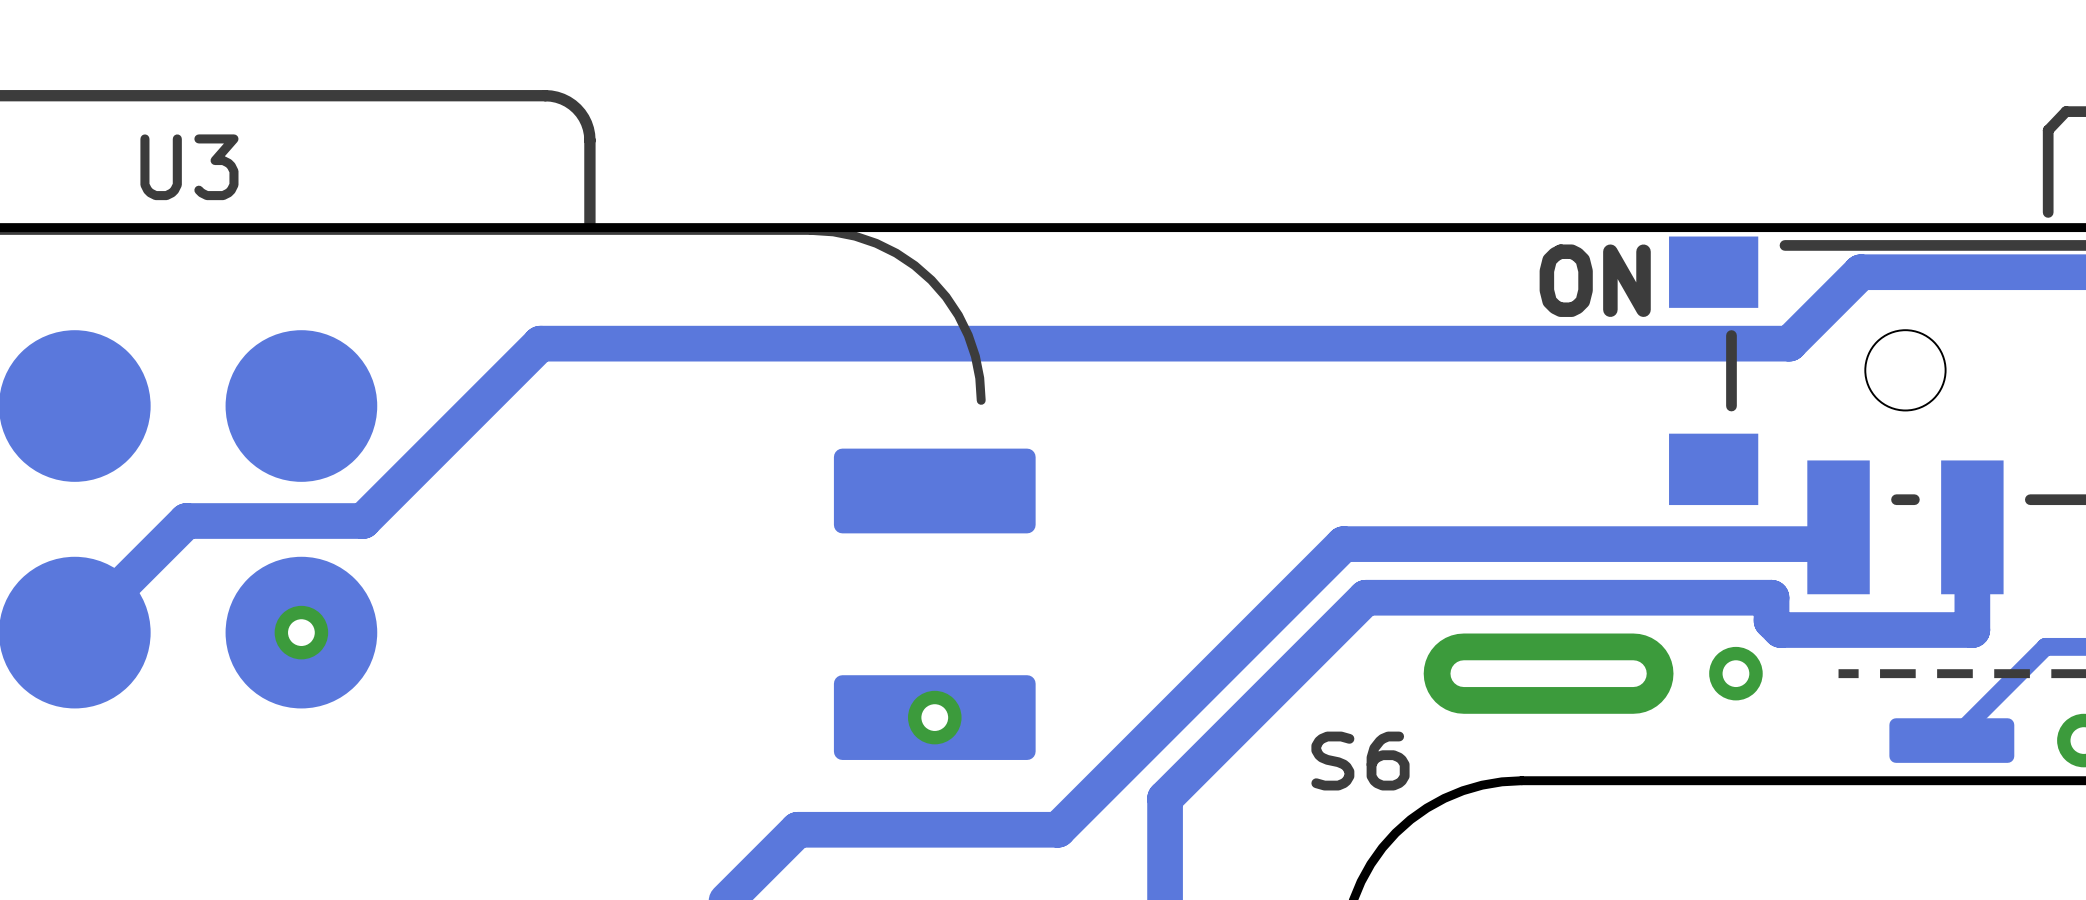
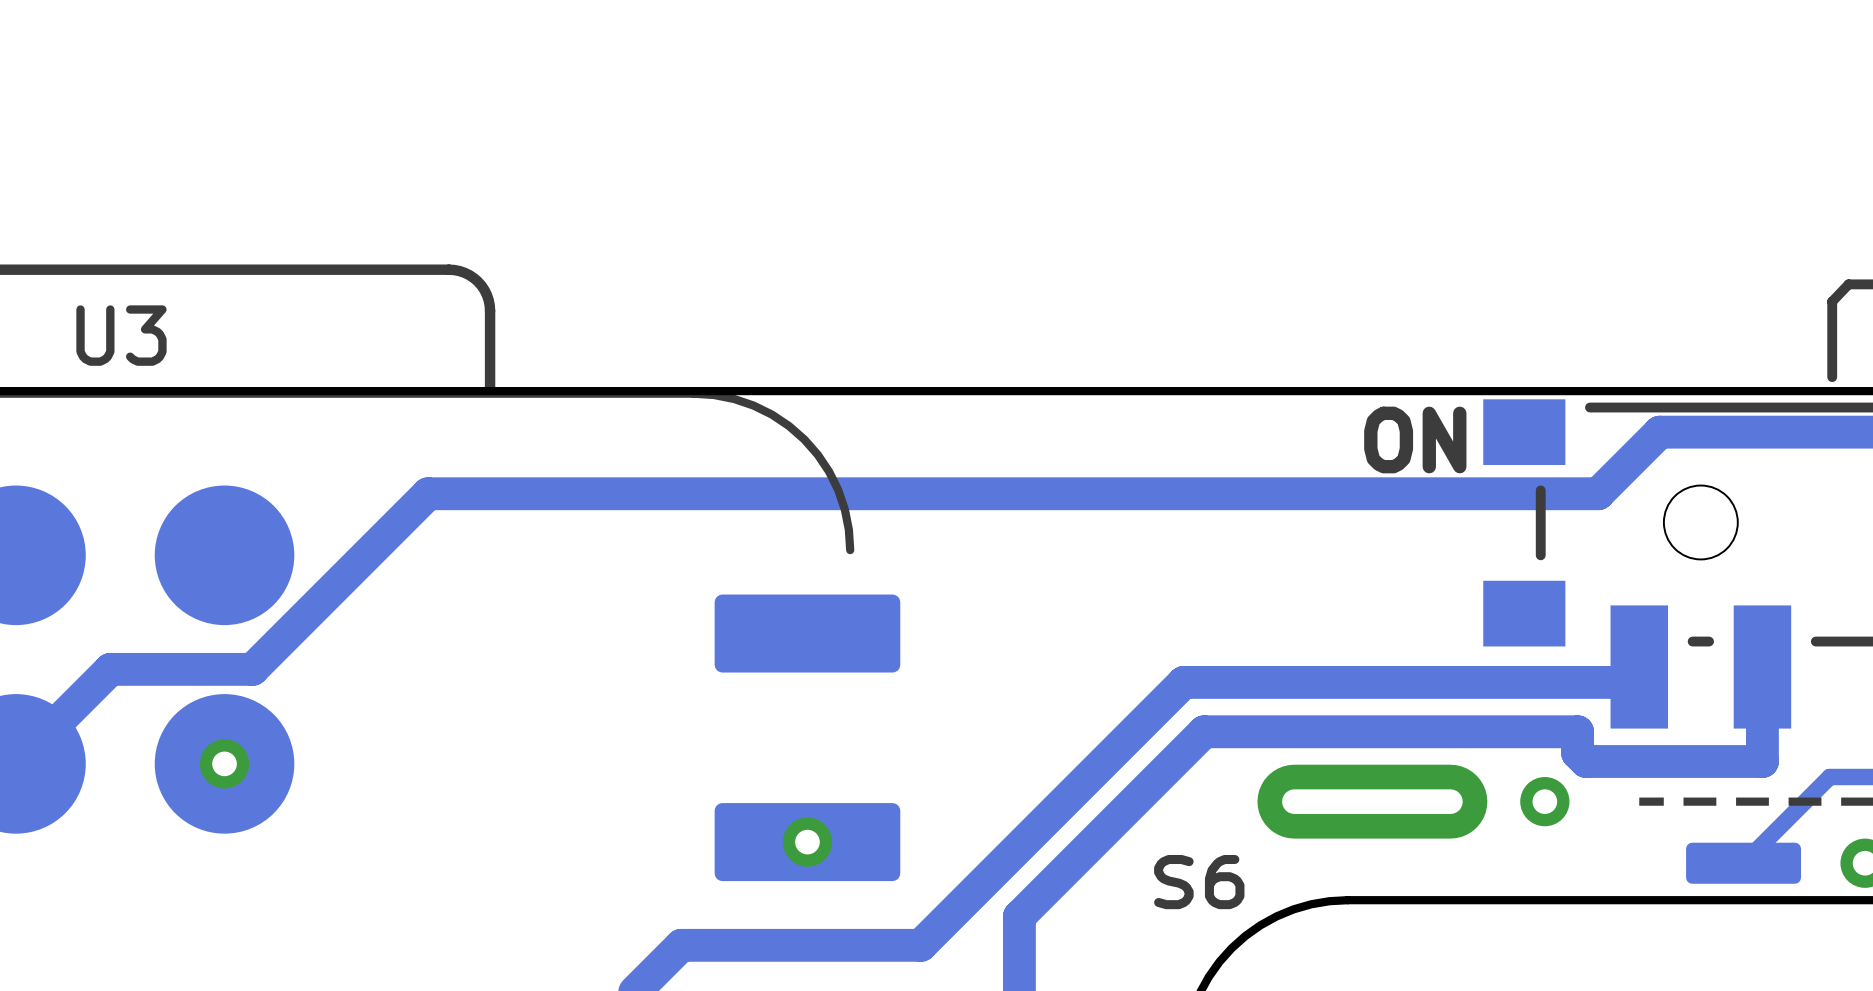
track: (1793, 339) (1789, 343) (540, 343) (363, 521) (186, 521) (177, 529) -> (1598, 493) (428, 493) (252, 669) (110, 669)

